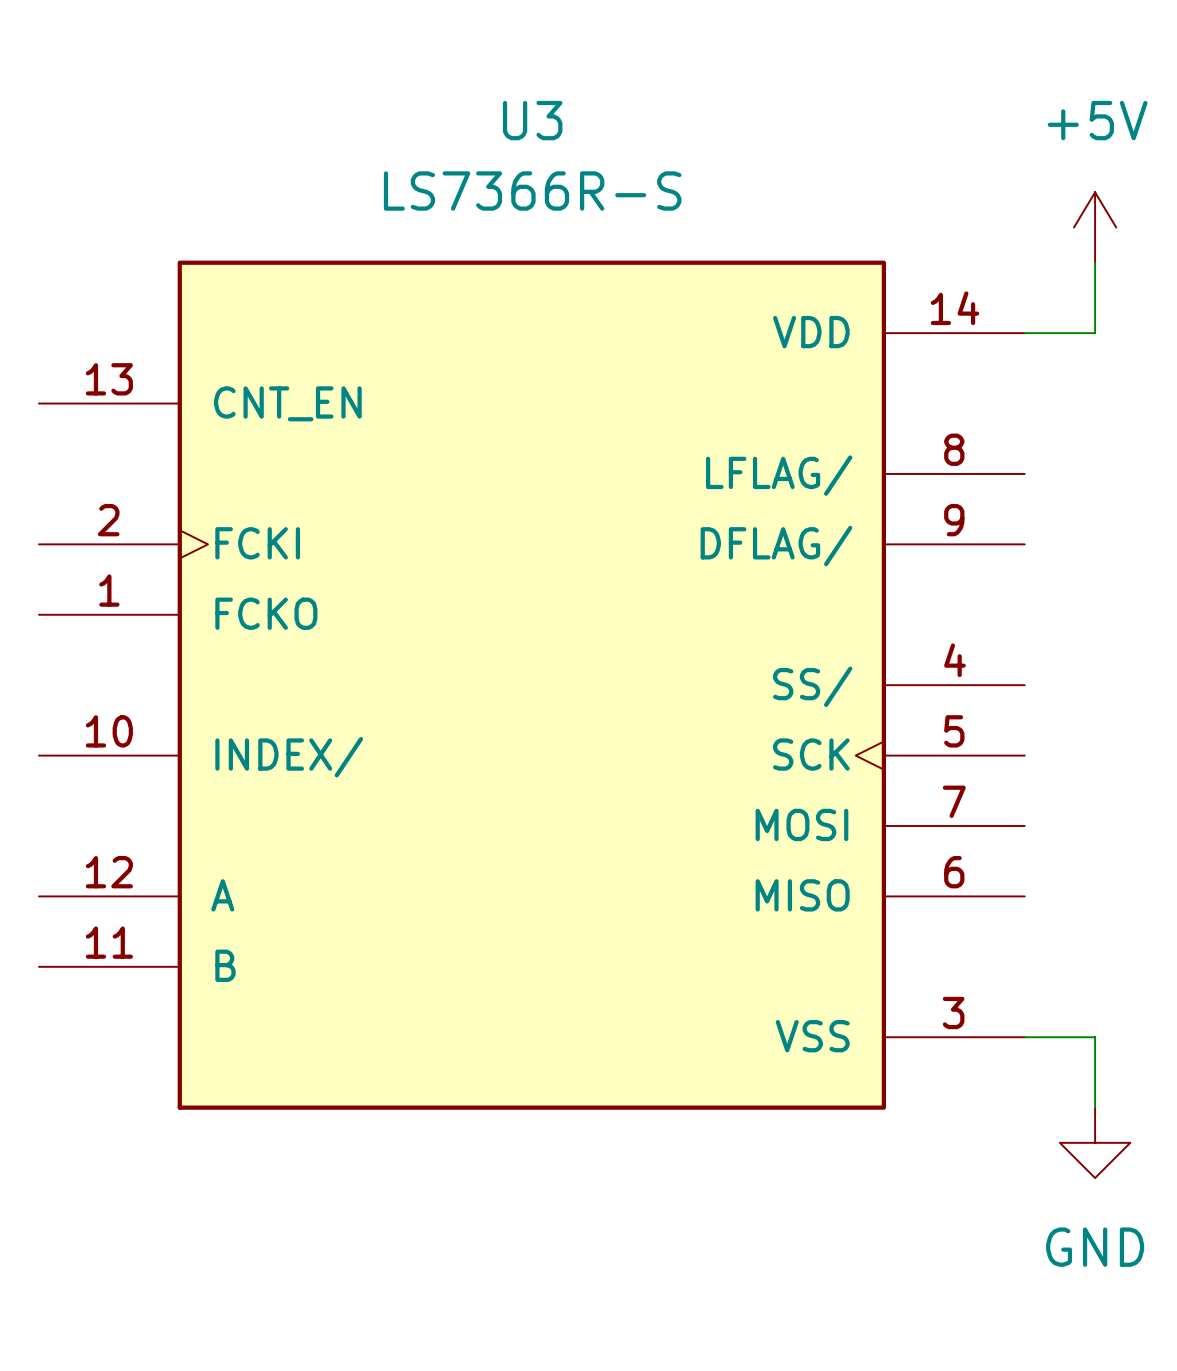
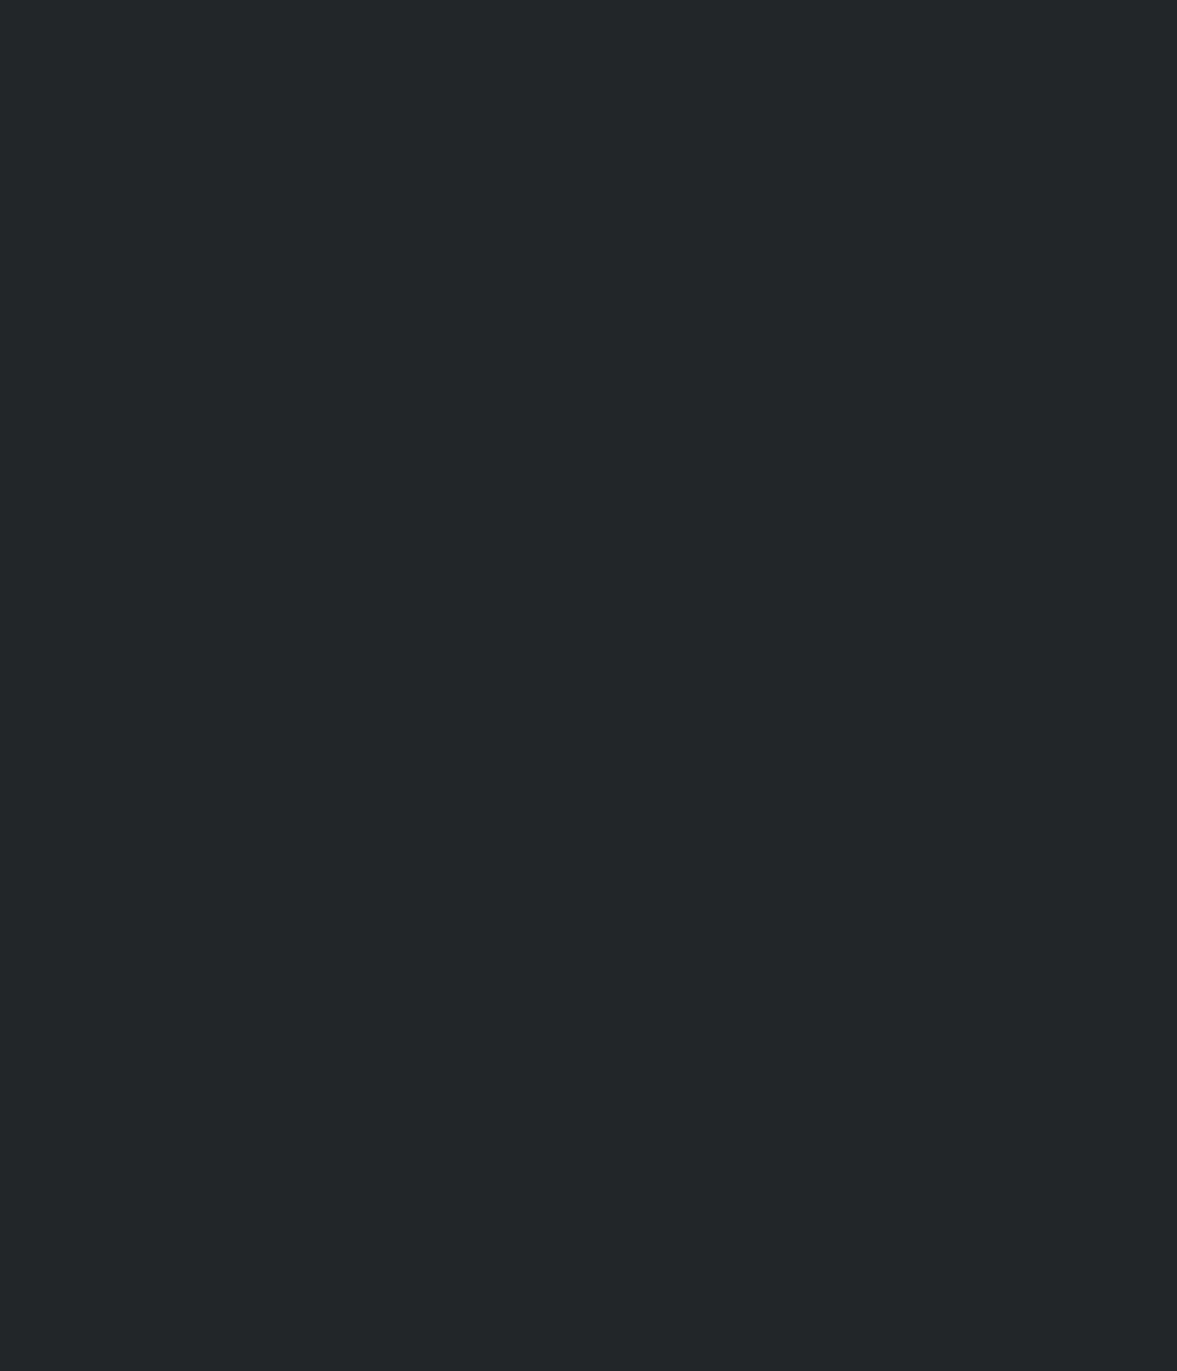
power symbol: +5V (1095, 227) -> none
wire: (1095, 262) (1095, 333) (1024, 333) -> none
U3: LS7366R-S (531, 685) -> none
wire: (1024, 1037) (1095, 1037) (1095, 1107) -> none
power symbol: GND (1095, 1142) -> none

